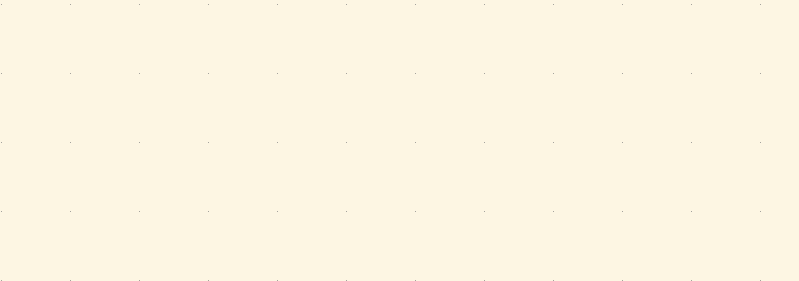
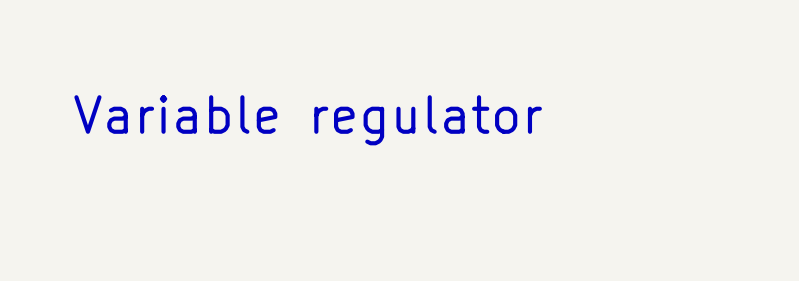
text: none -> Variable regulator (308, 120)

